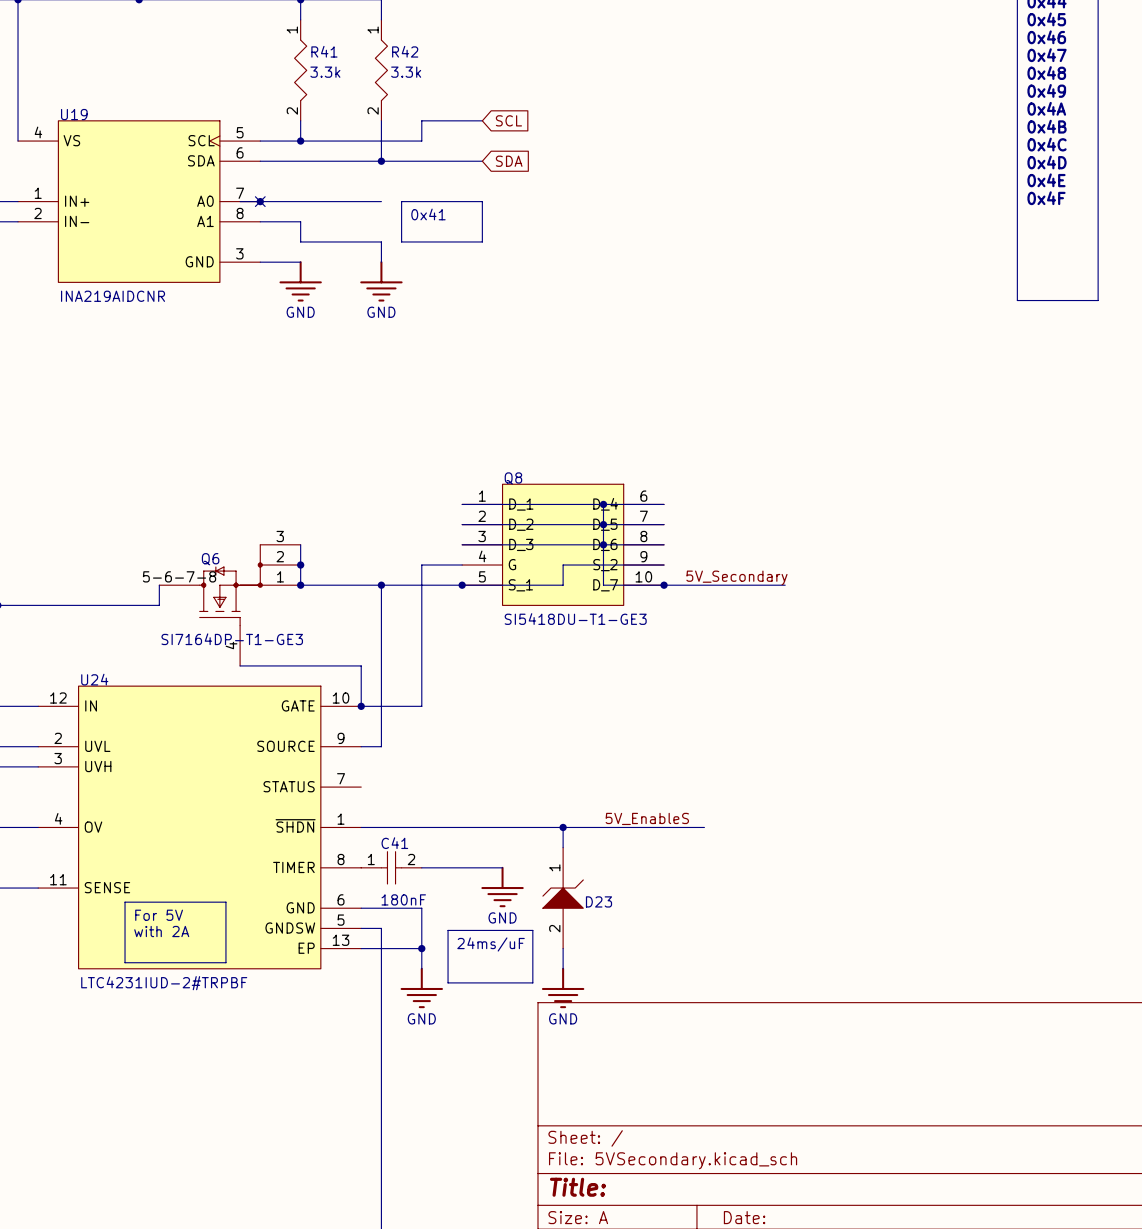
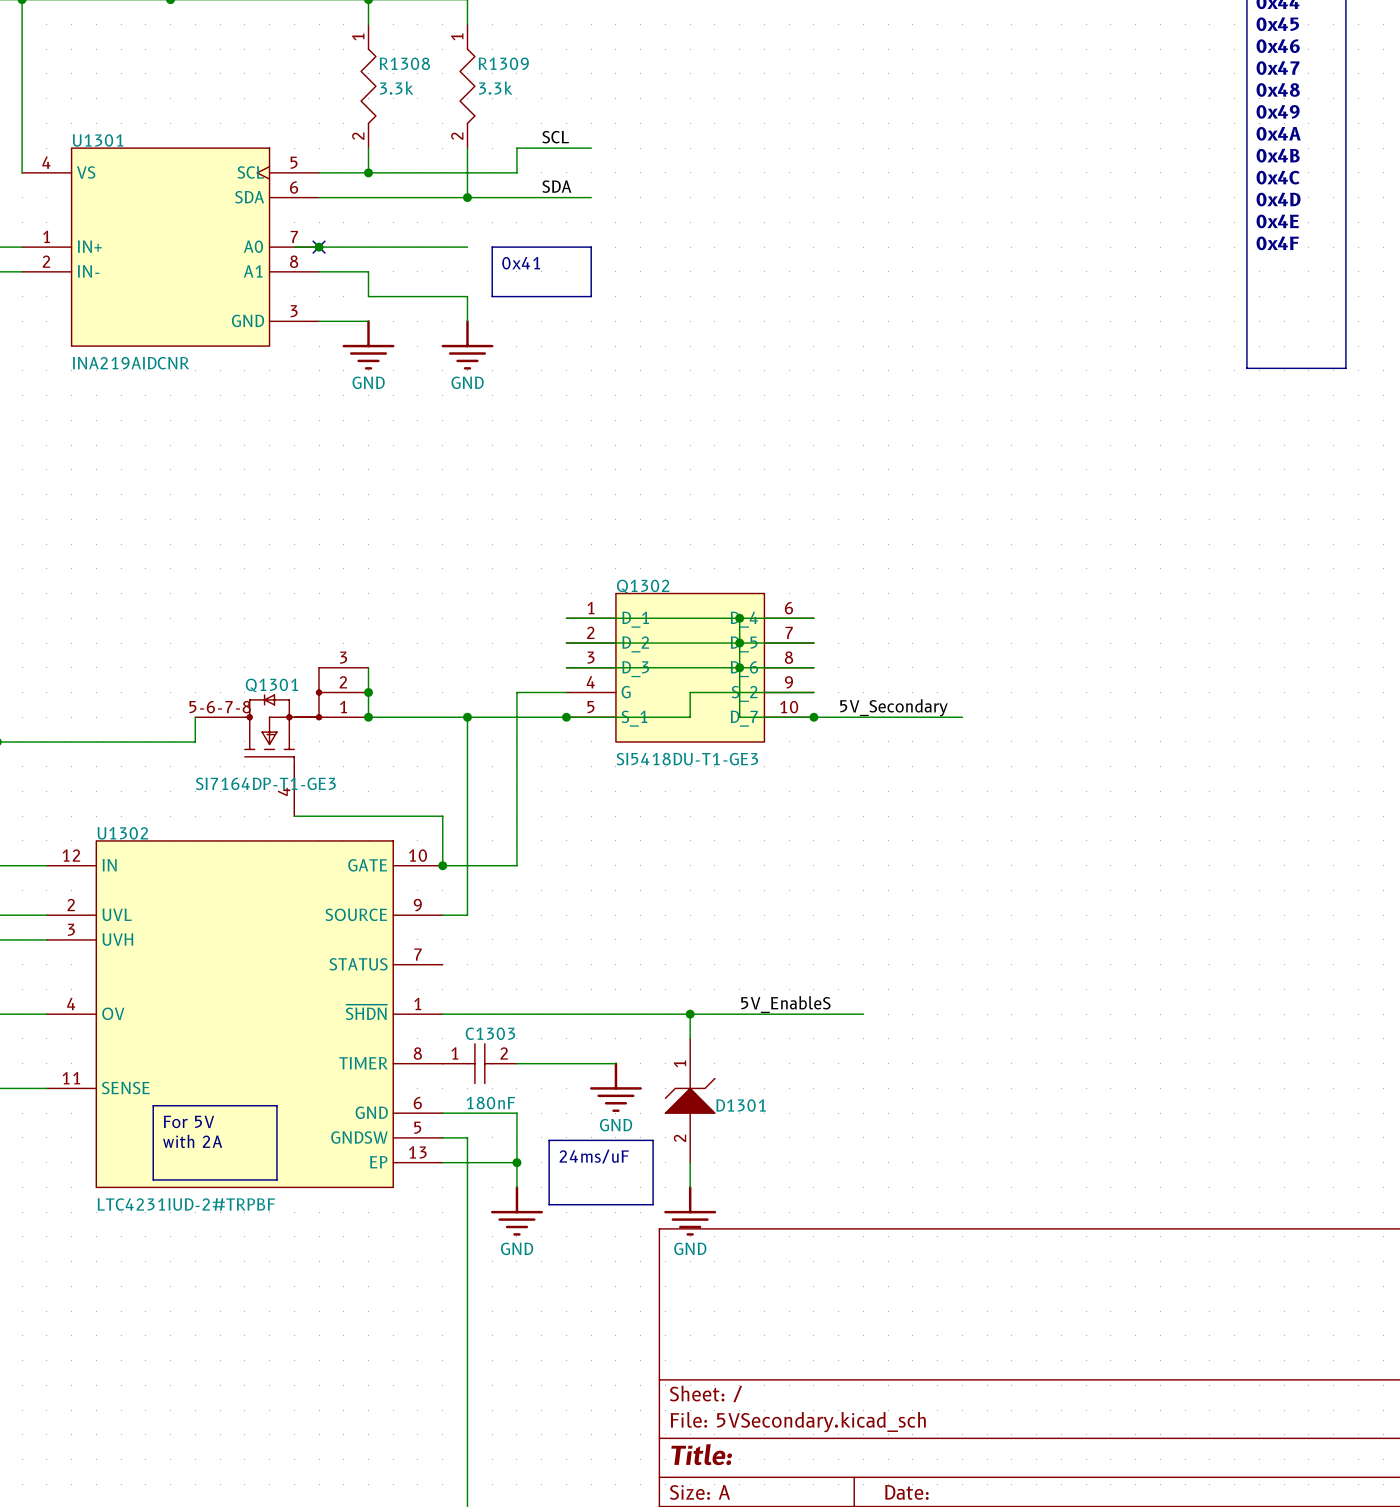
R41 name: R41 (324, 51) -> R1308 (404, 63)
R42 name: R42 (405, 51) -> R1309 (503, 63)
label: none -> SCL (555, 137)
U19 name: U19 (74, 114) -> U1301 (98, 140)
global label: SCL (508, 120) -> none
label: none -> SDA (556, 186)
global label: SDA (509, 161) -> none
Q8 name: Q8 (513, 478) -> Q1302 (643, 586)
Q6 name: Q6 (210, 559) -> Q1301 (271, 685)
U24 name: U24 (94, 679) -> U1302 (122, 833)
C41 name: C41 (394, 843) -> C1303 (490, 1033)
D23 name: D23 (599, 901) -> D1301 (741, 1105)

